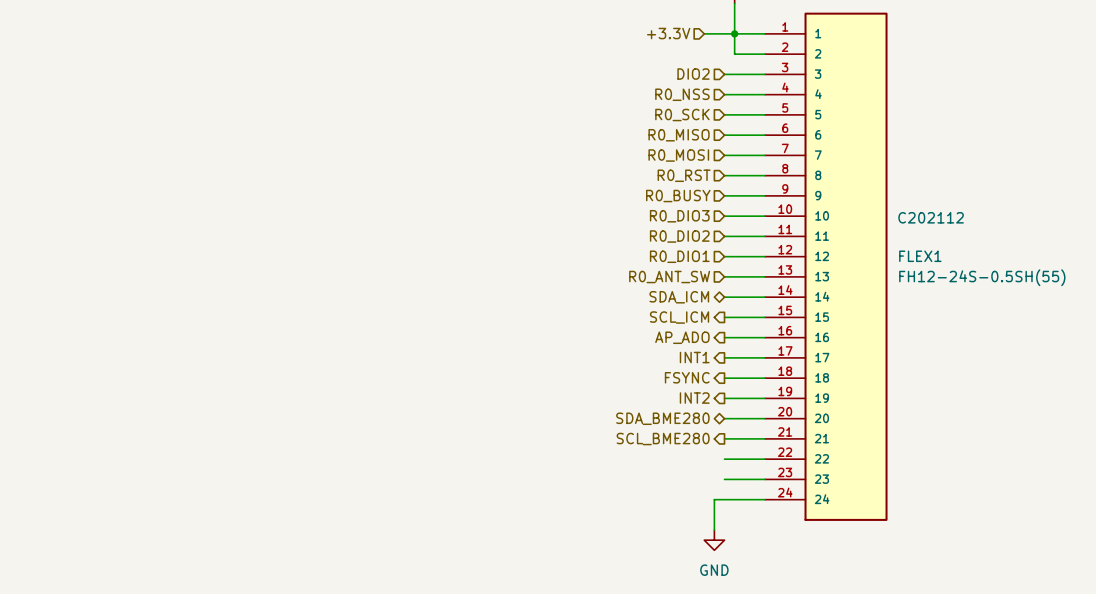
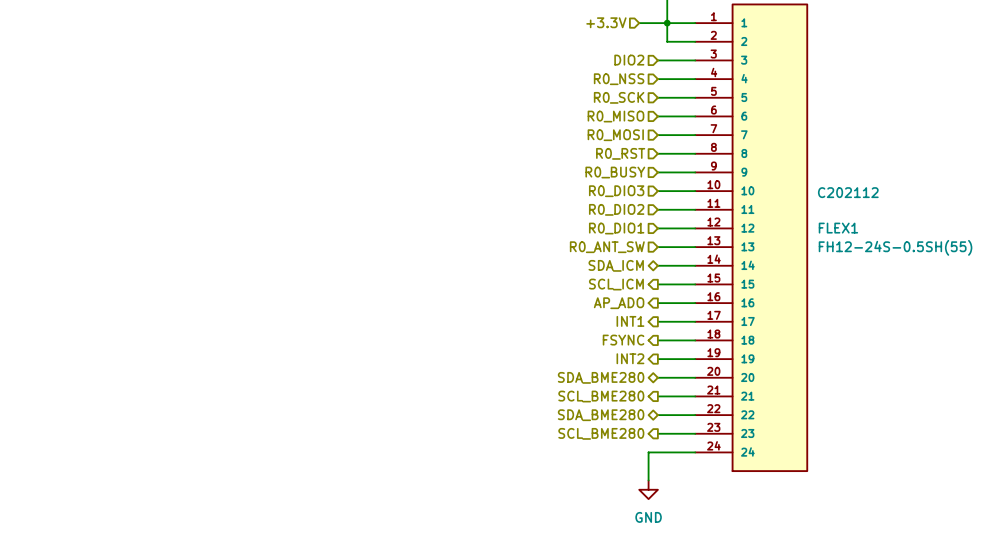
hierarchical label: none -> SDA_BME280 (601, 415)
hierarchical label: none -> SCL_BME280 (601, 433)

